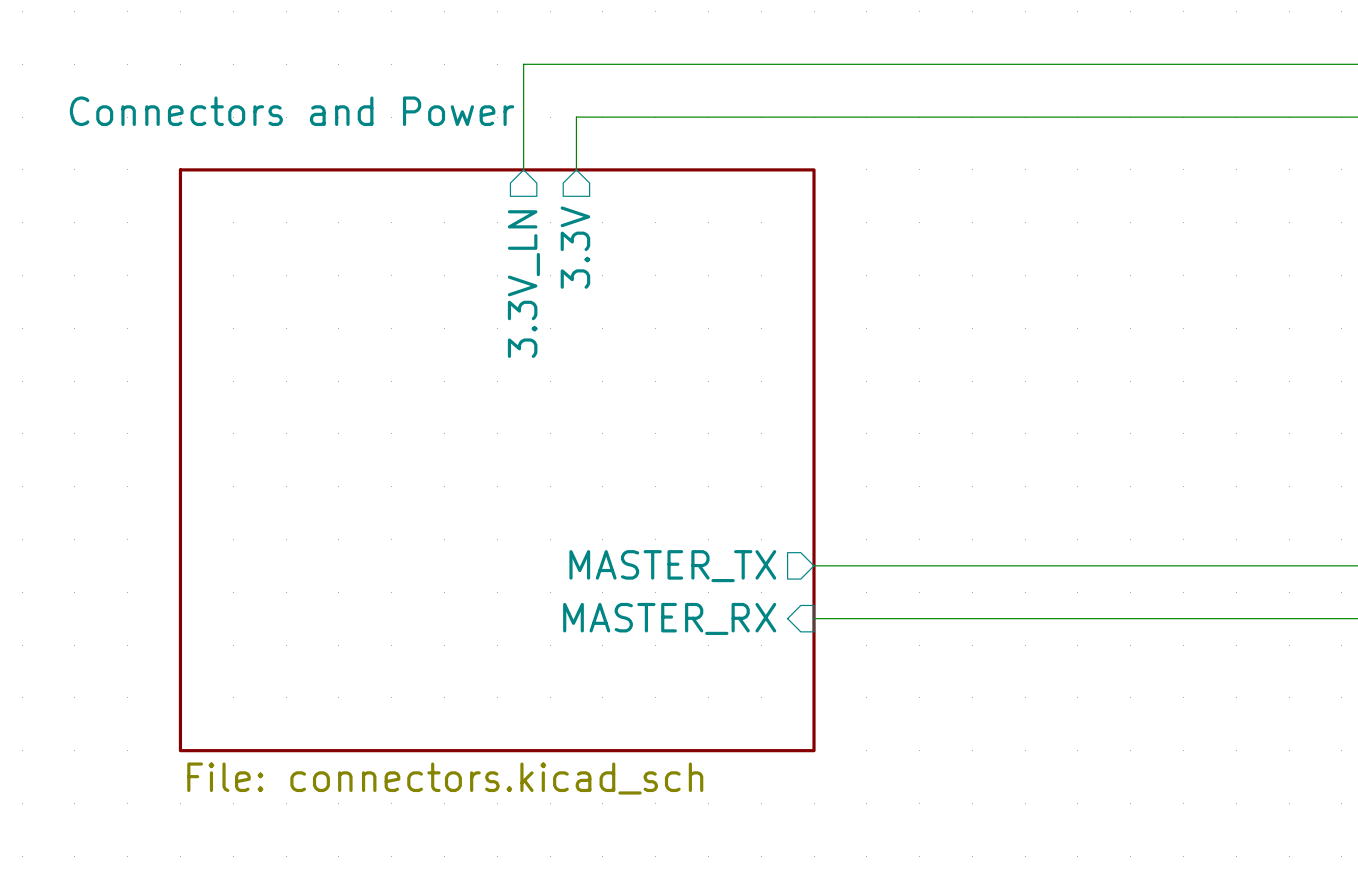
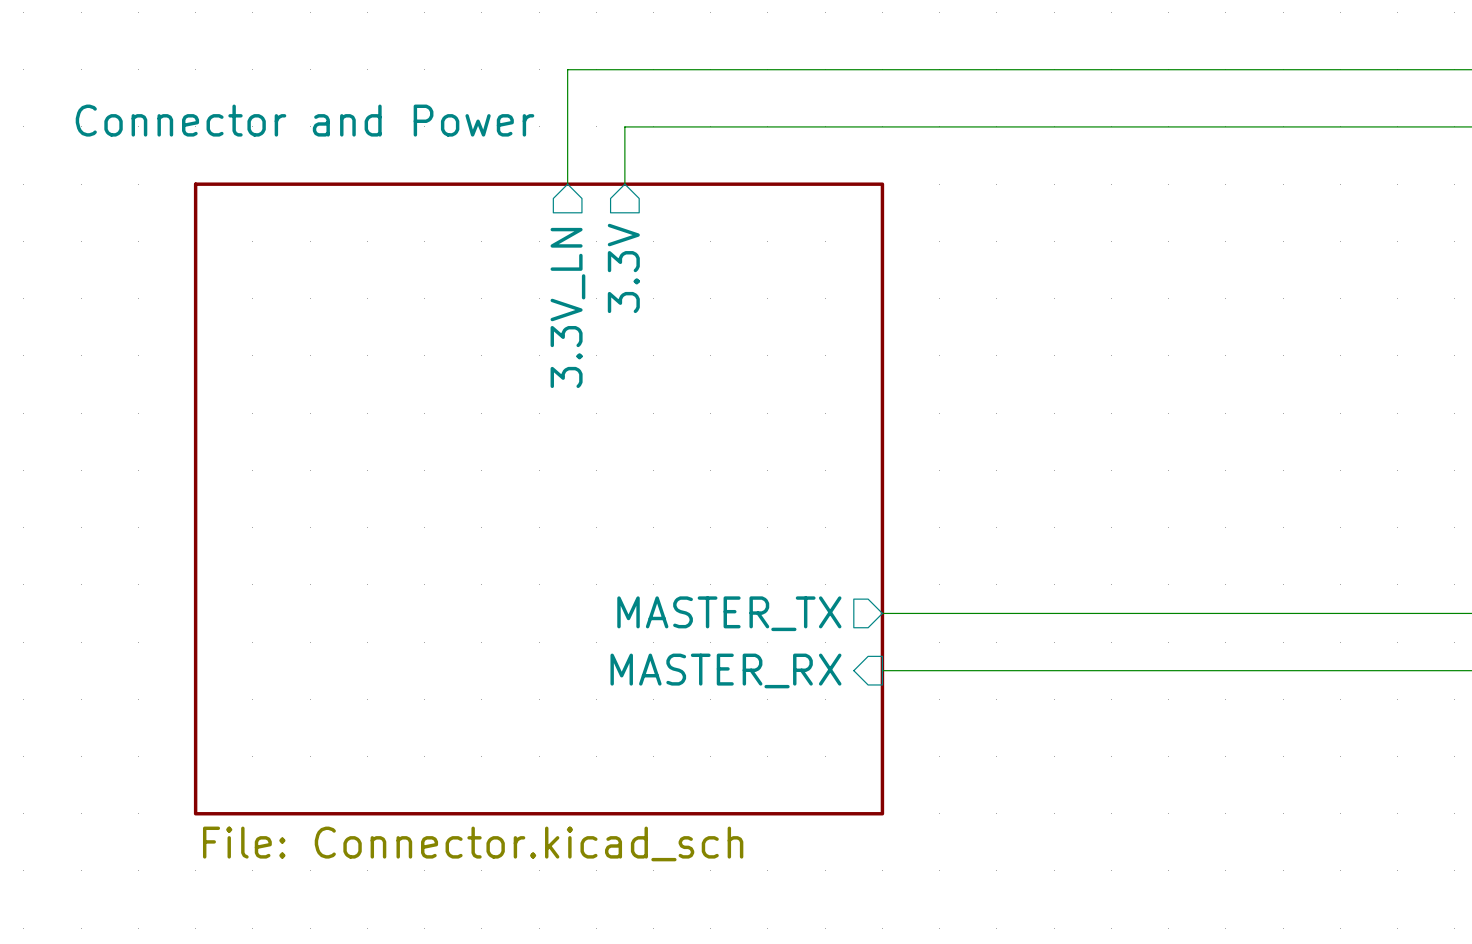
sheet Connectors and Power name: Connectors and Power (292, 111) -> Connector and Power (304, 120)
sheet Connectors and Power value: File: connectors.kicad_sch (445, 778) -> File: Connector.kicad_sch (473, 843)

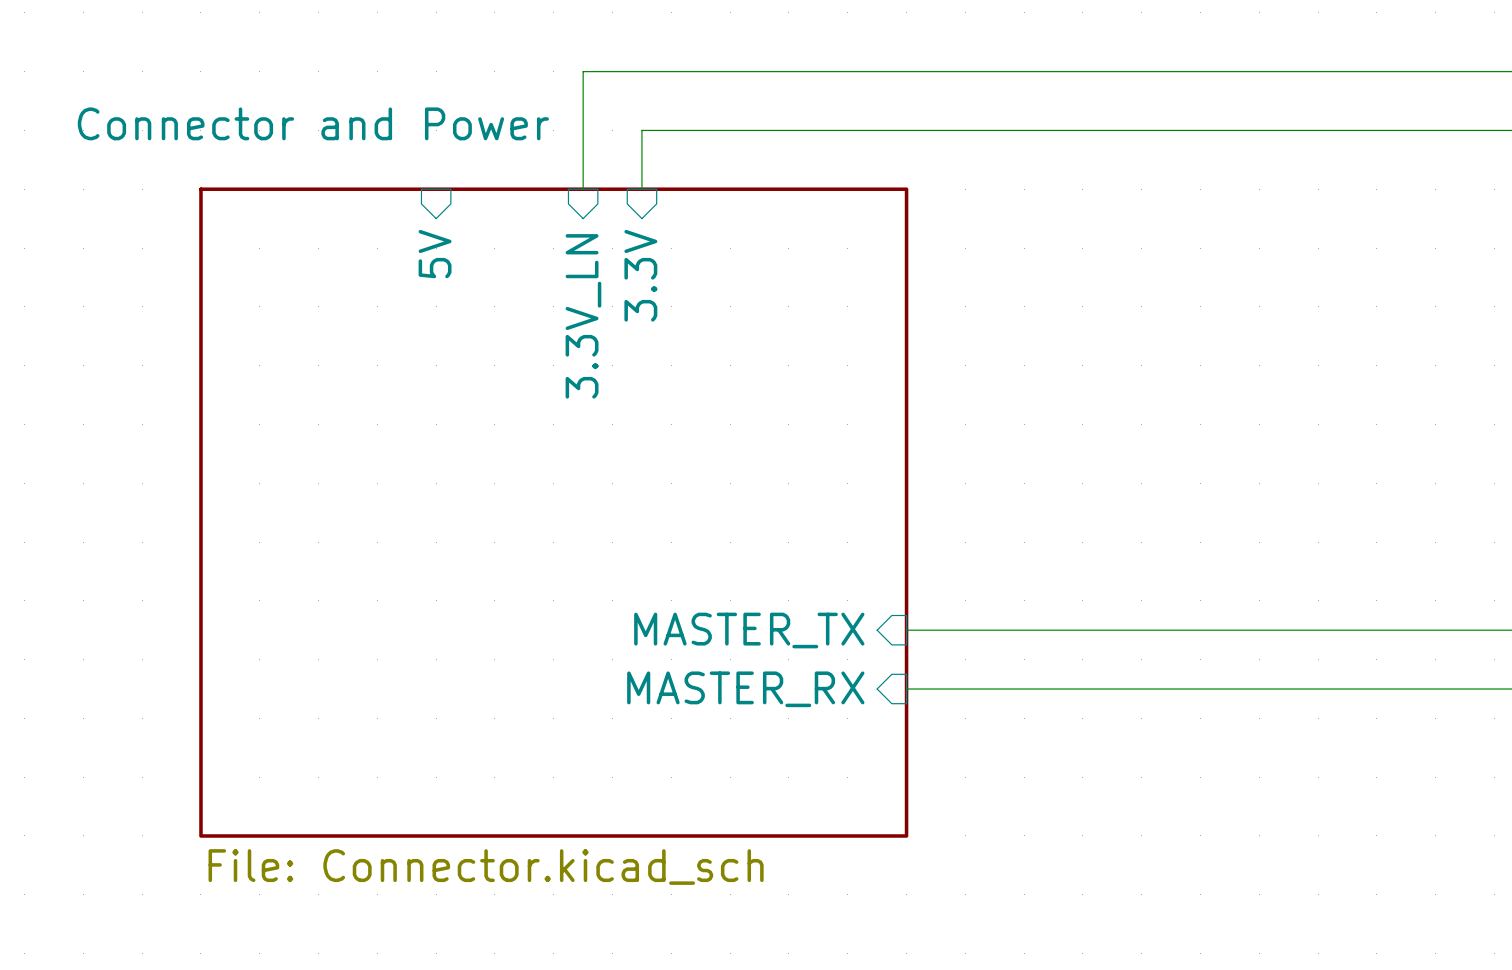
sheet pin: none -> 5V (435, 254)
sheet pin shape: output (623, 268) -> input (640, 275)
sheet pin shape: output (567, 307) -> input (583, 316)
sheet pin shape: output (729, 613) -> input (749, 630)

